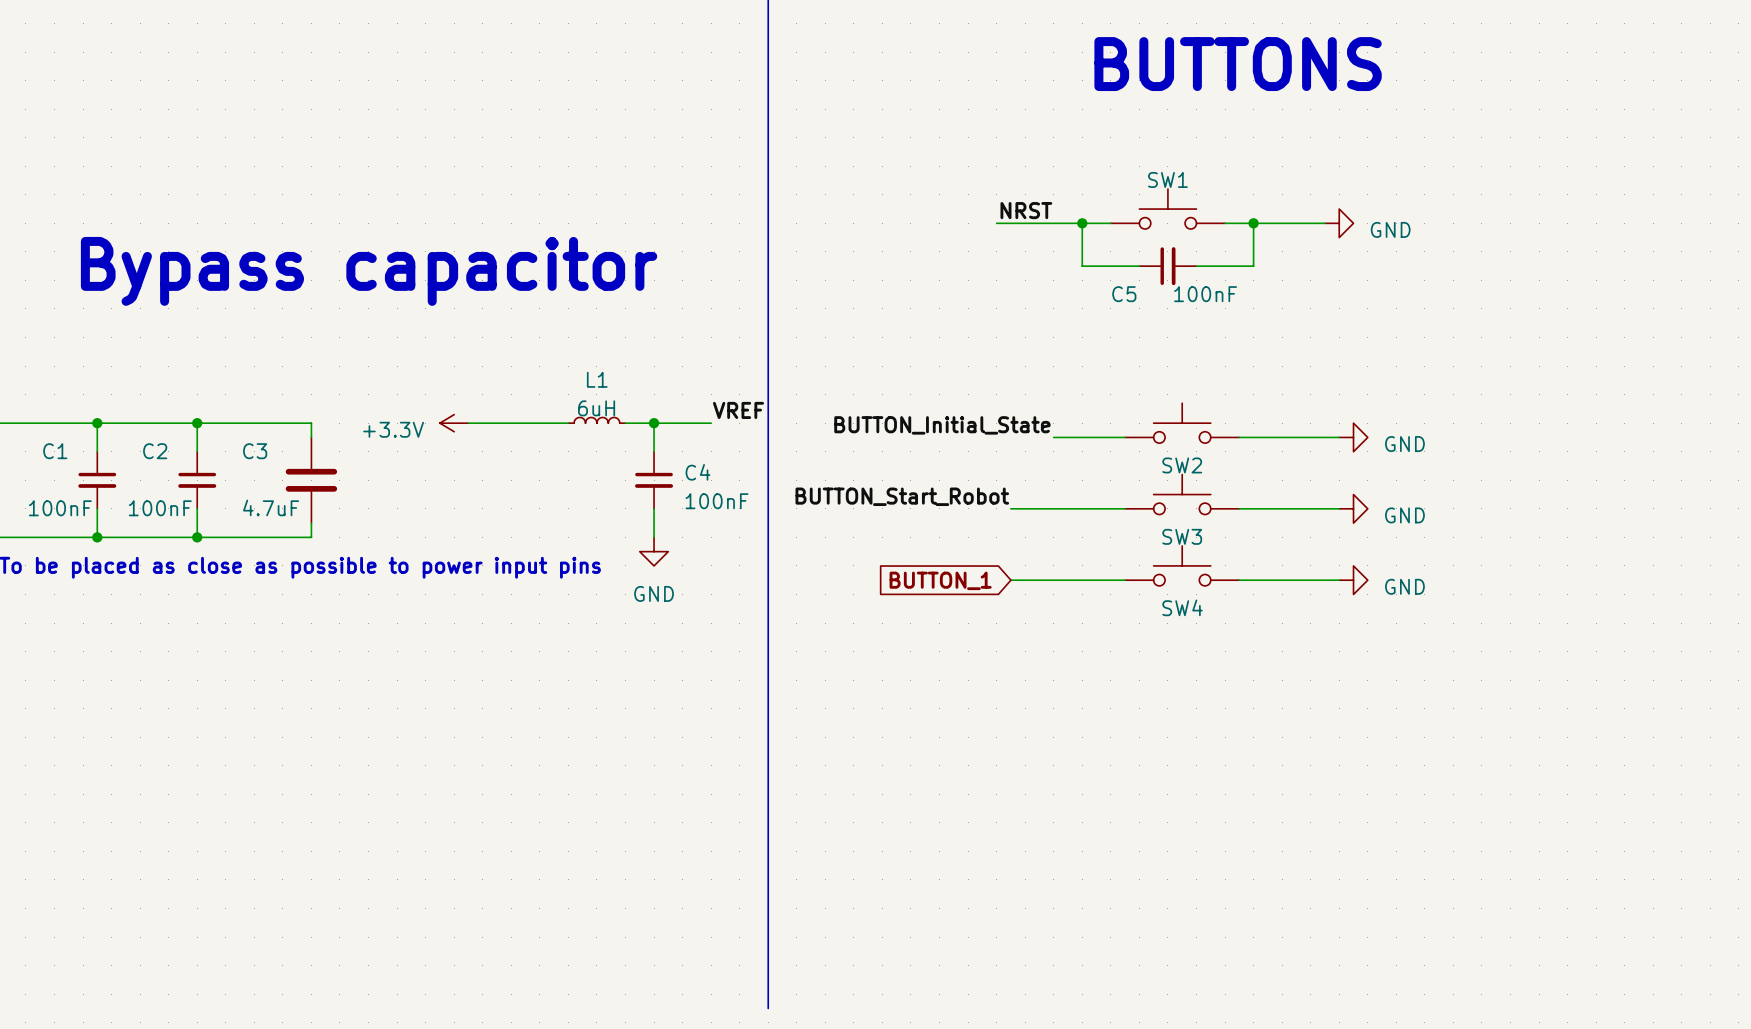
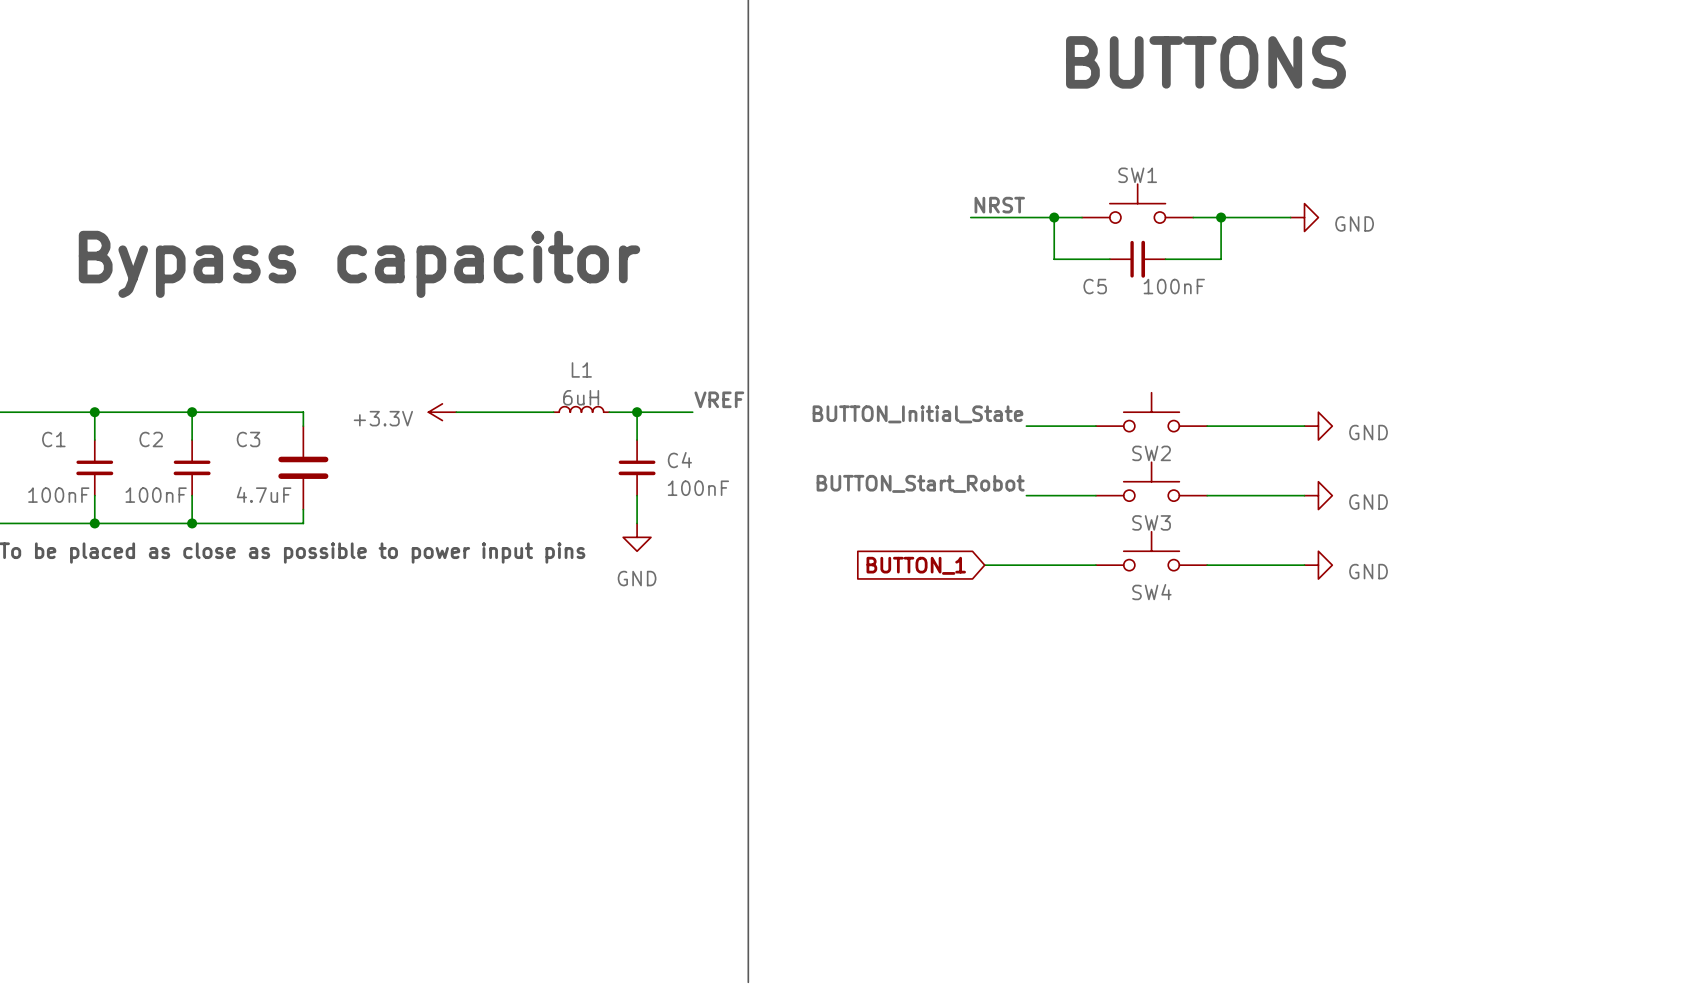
label position: BUTTON_Start_Robot (902, 496) -> BUTTON_Start_Robot (920, 483)
wire: (1010, 508) (1053, 508) -> none

